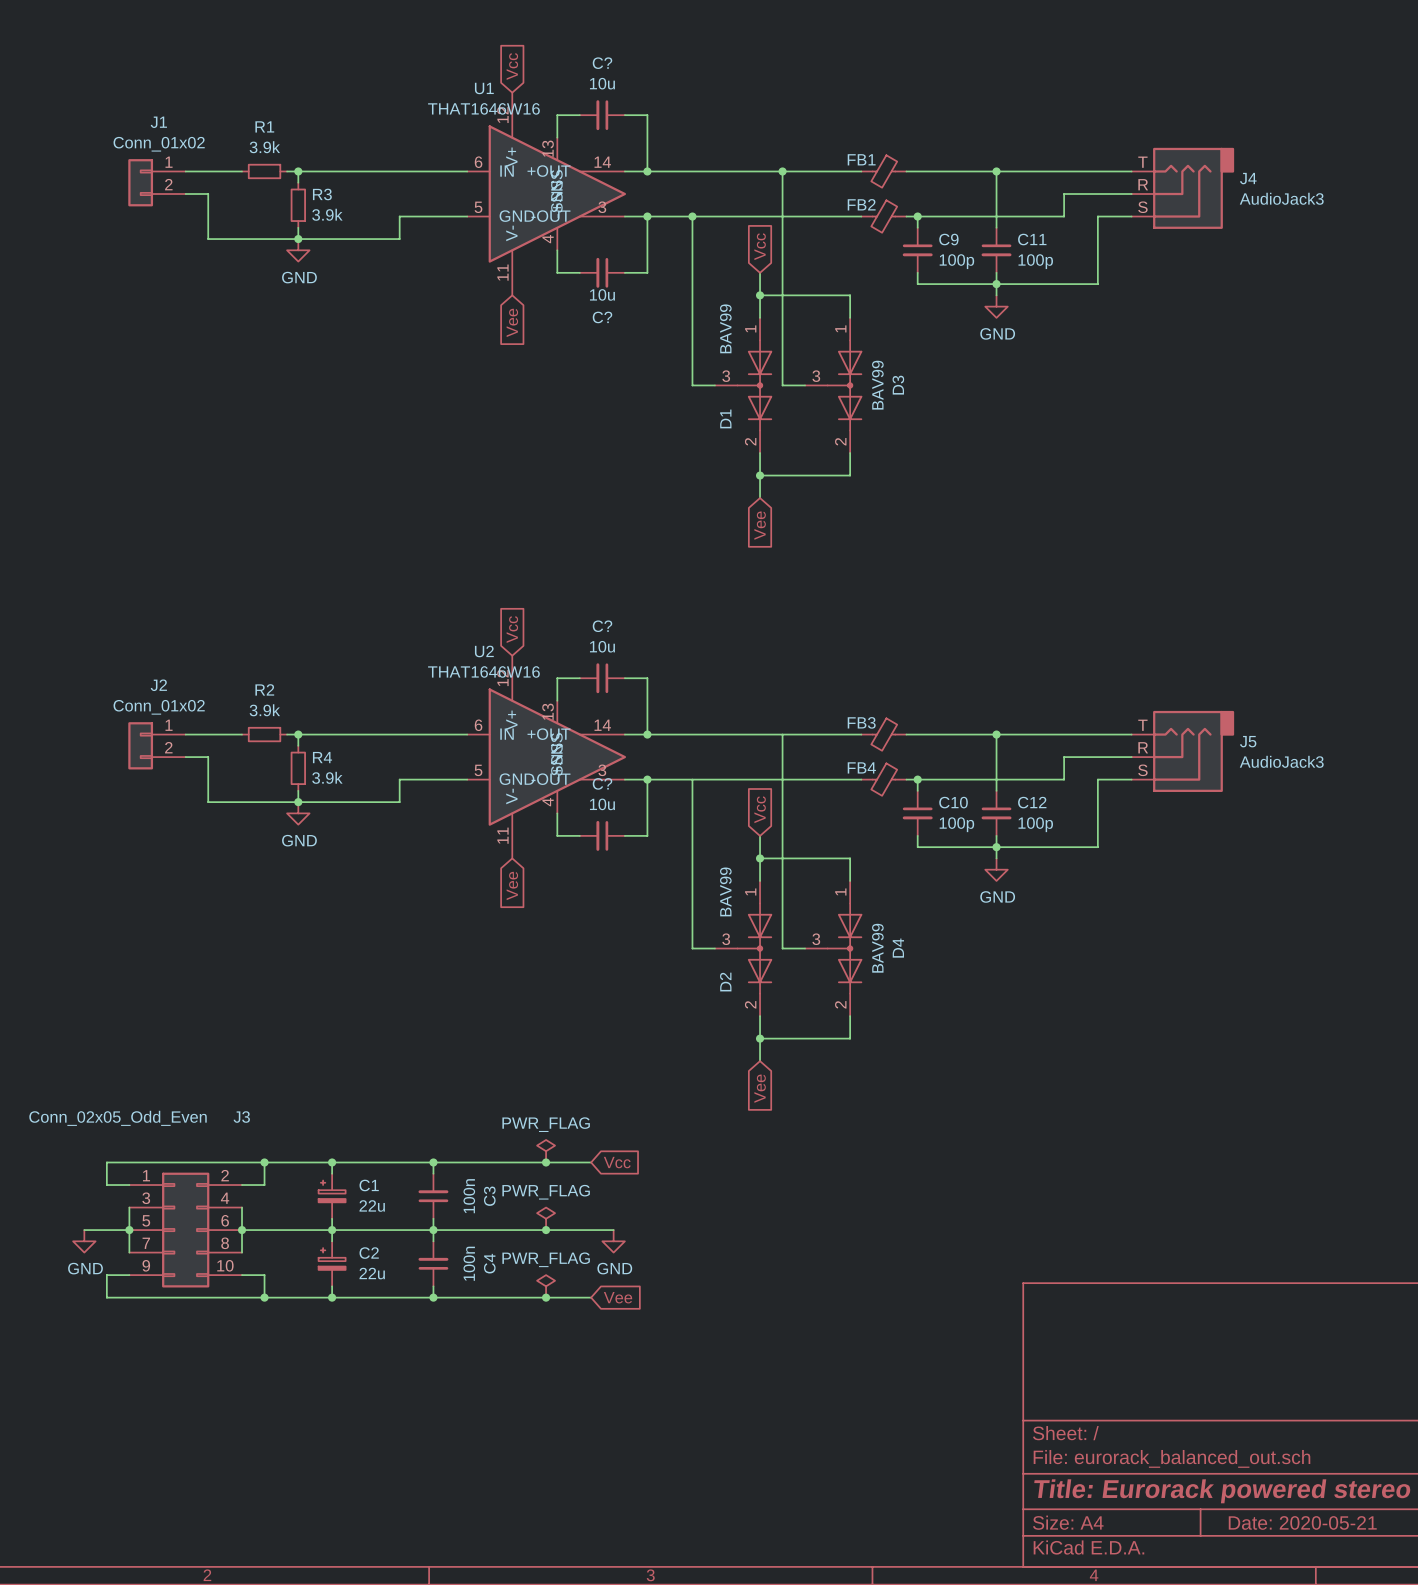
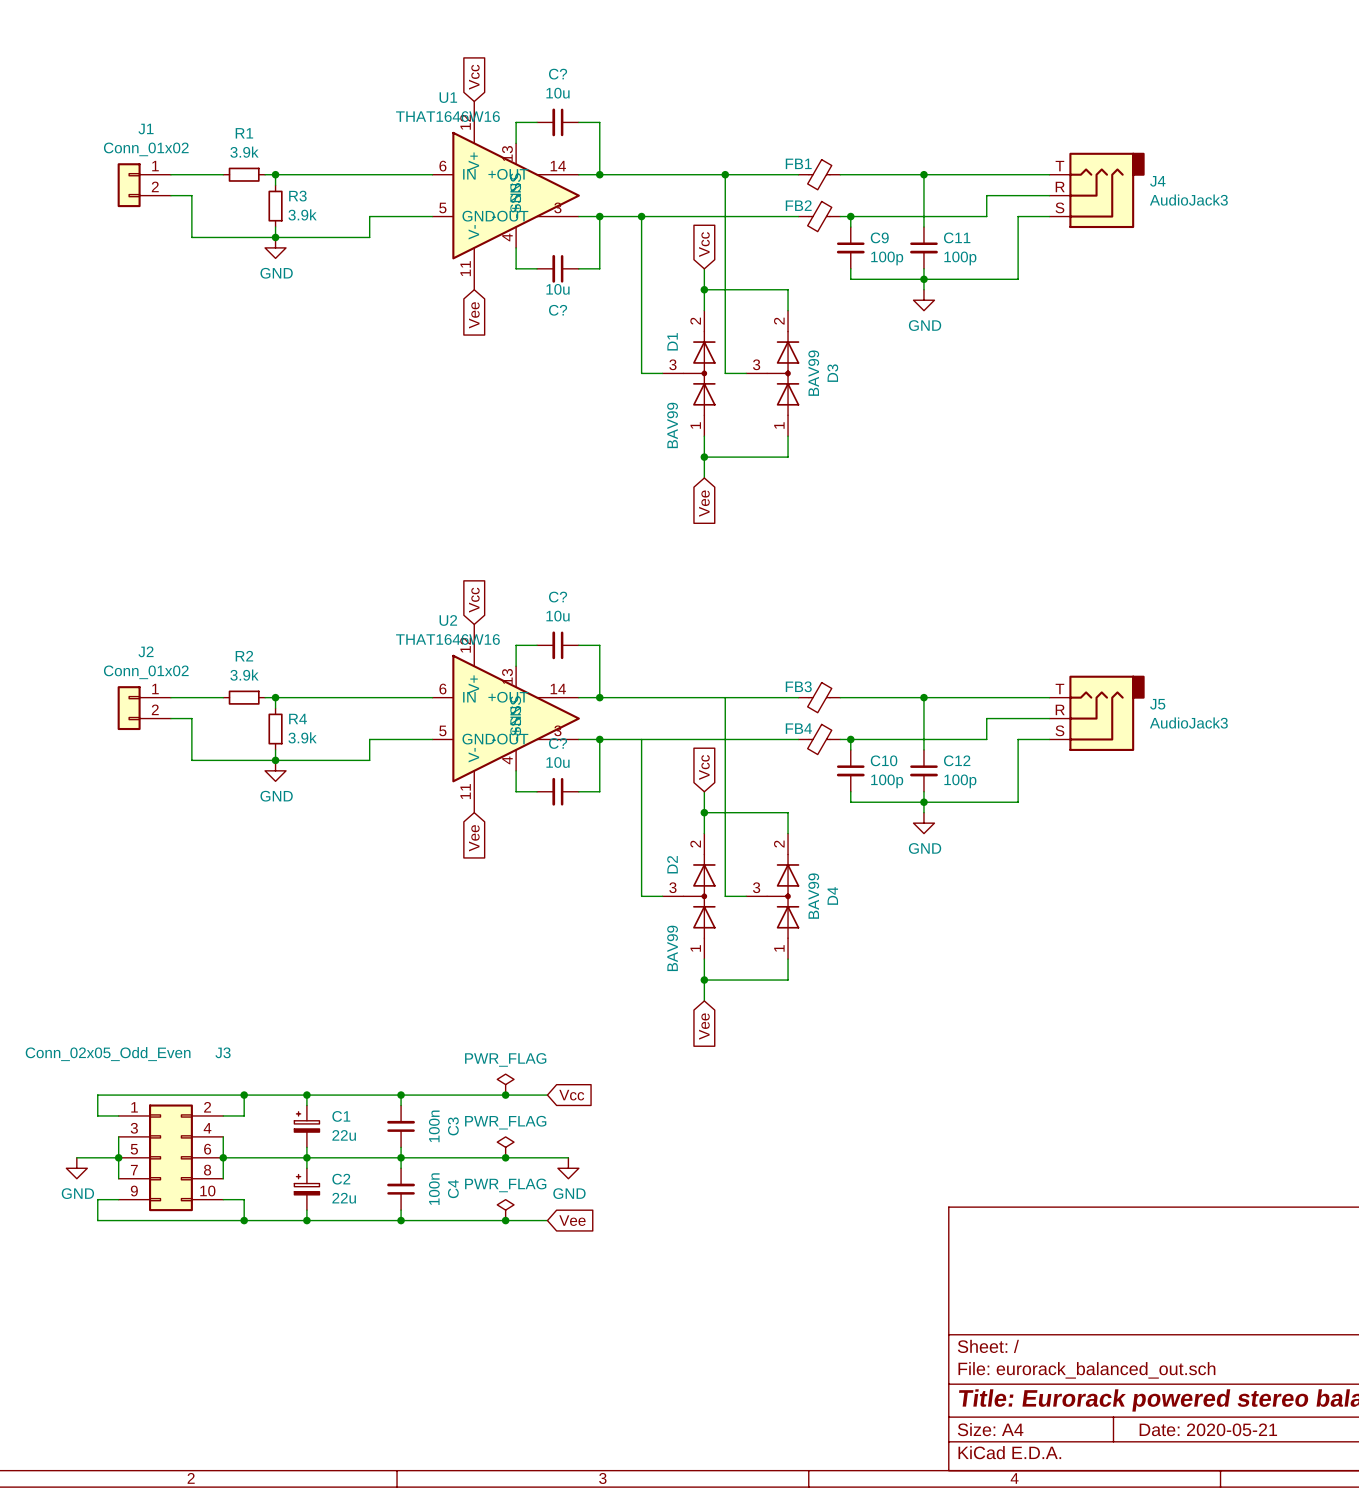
D1 flip: as is (754, 385) -> up-down (699, 373)
D3 flip: as is (844, 385) -> up-down (783, 373)
D2 flip: as is (754, 948) -> up-down (699, 896)
D4 flip: as is (844, 948) -> up-down (783, 896)

